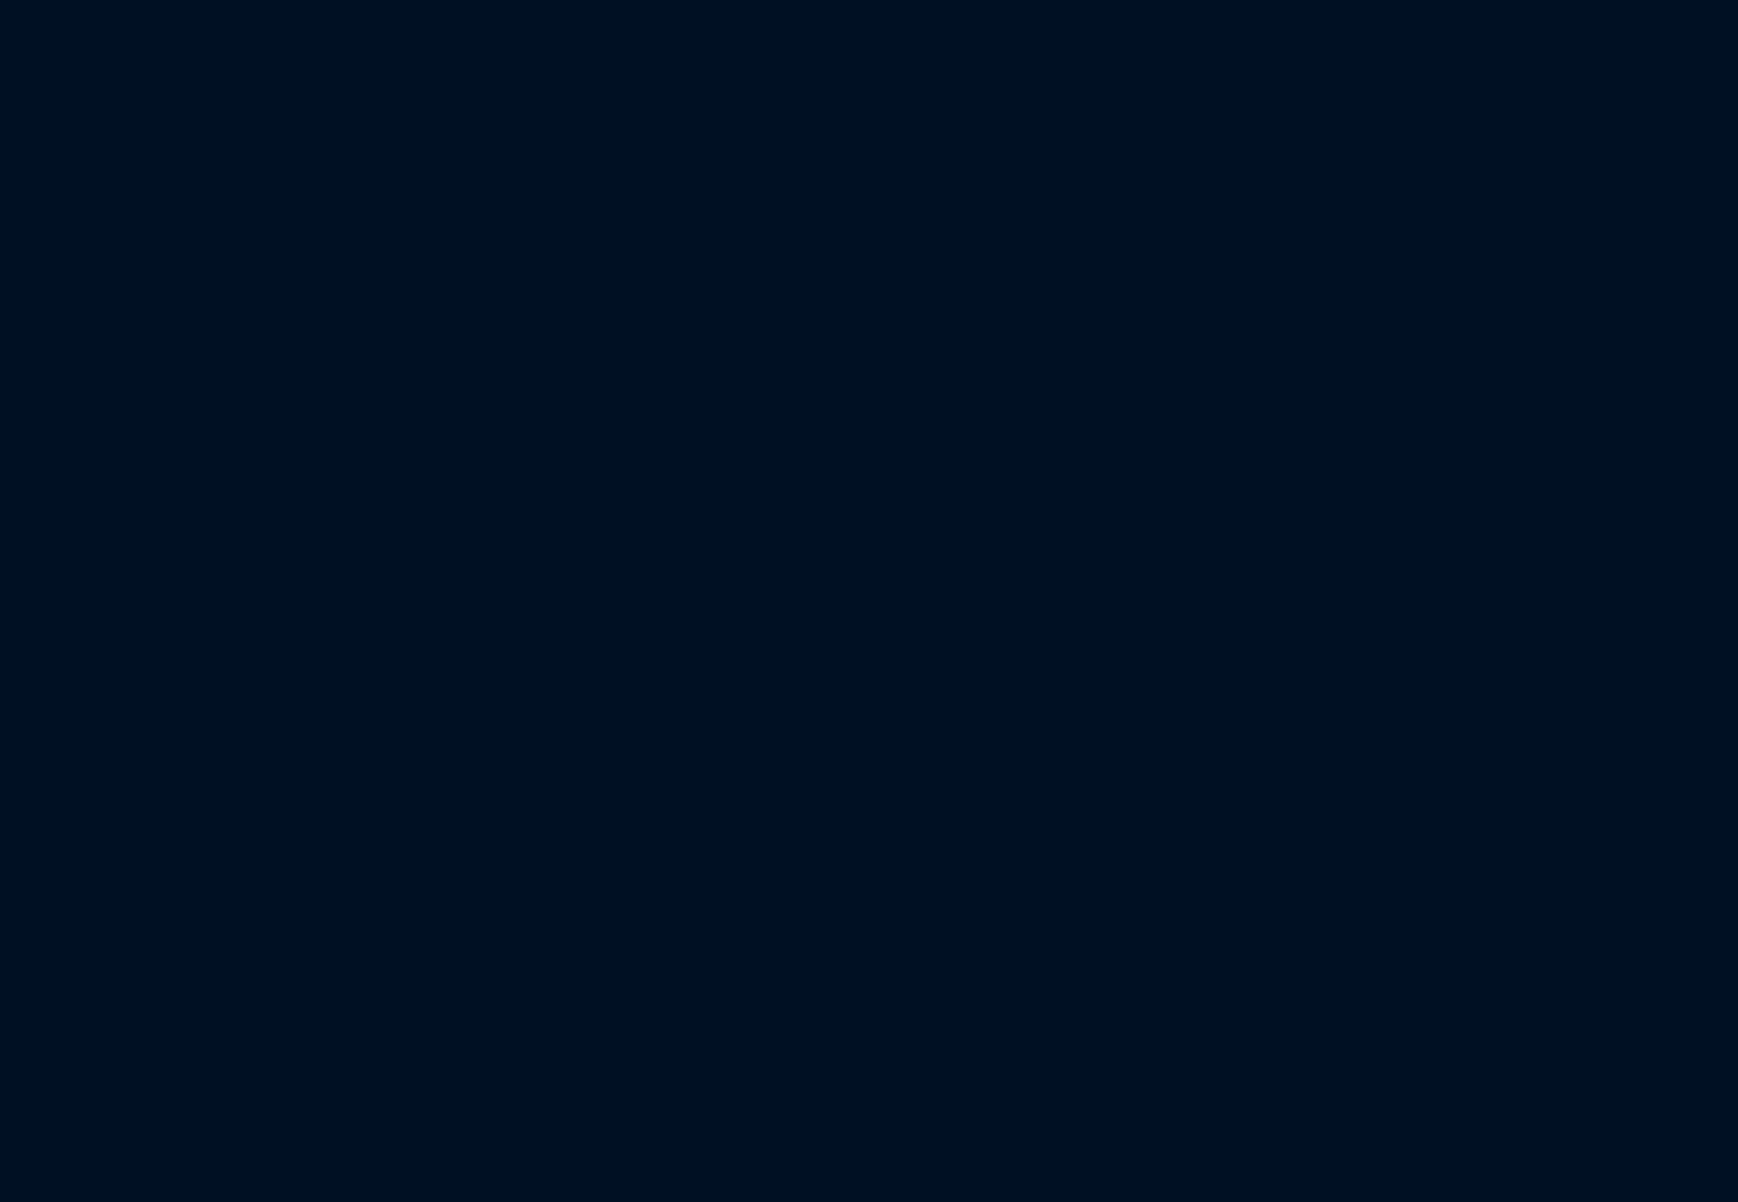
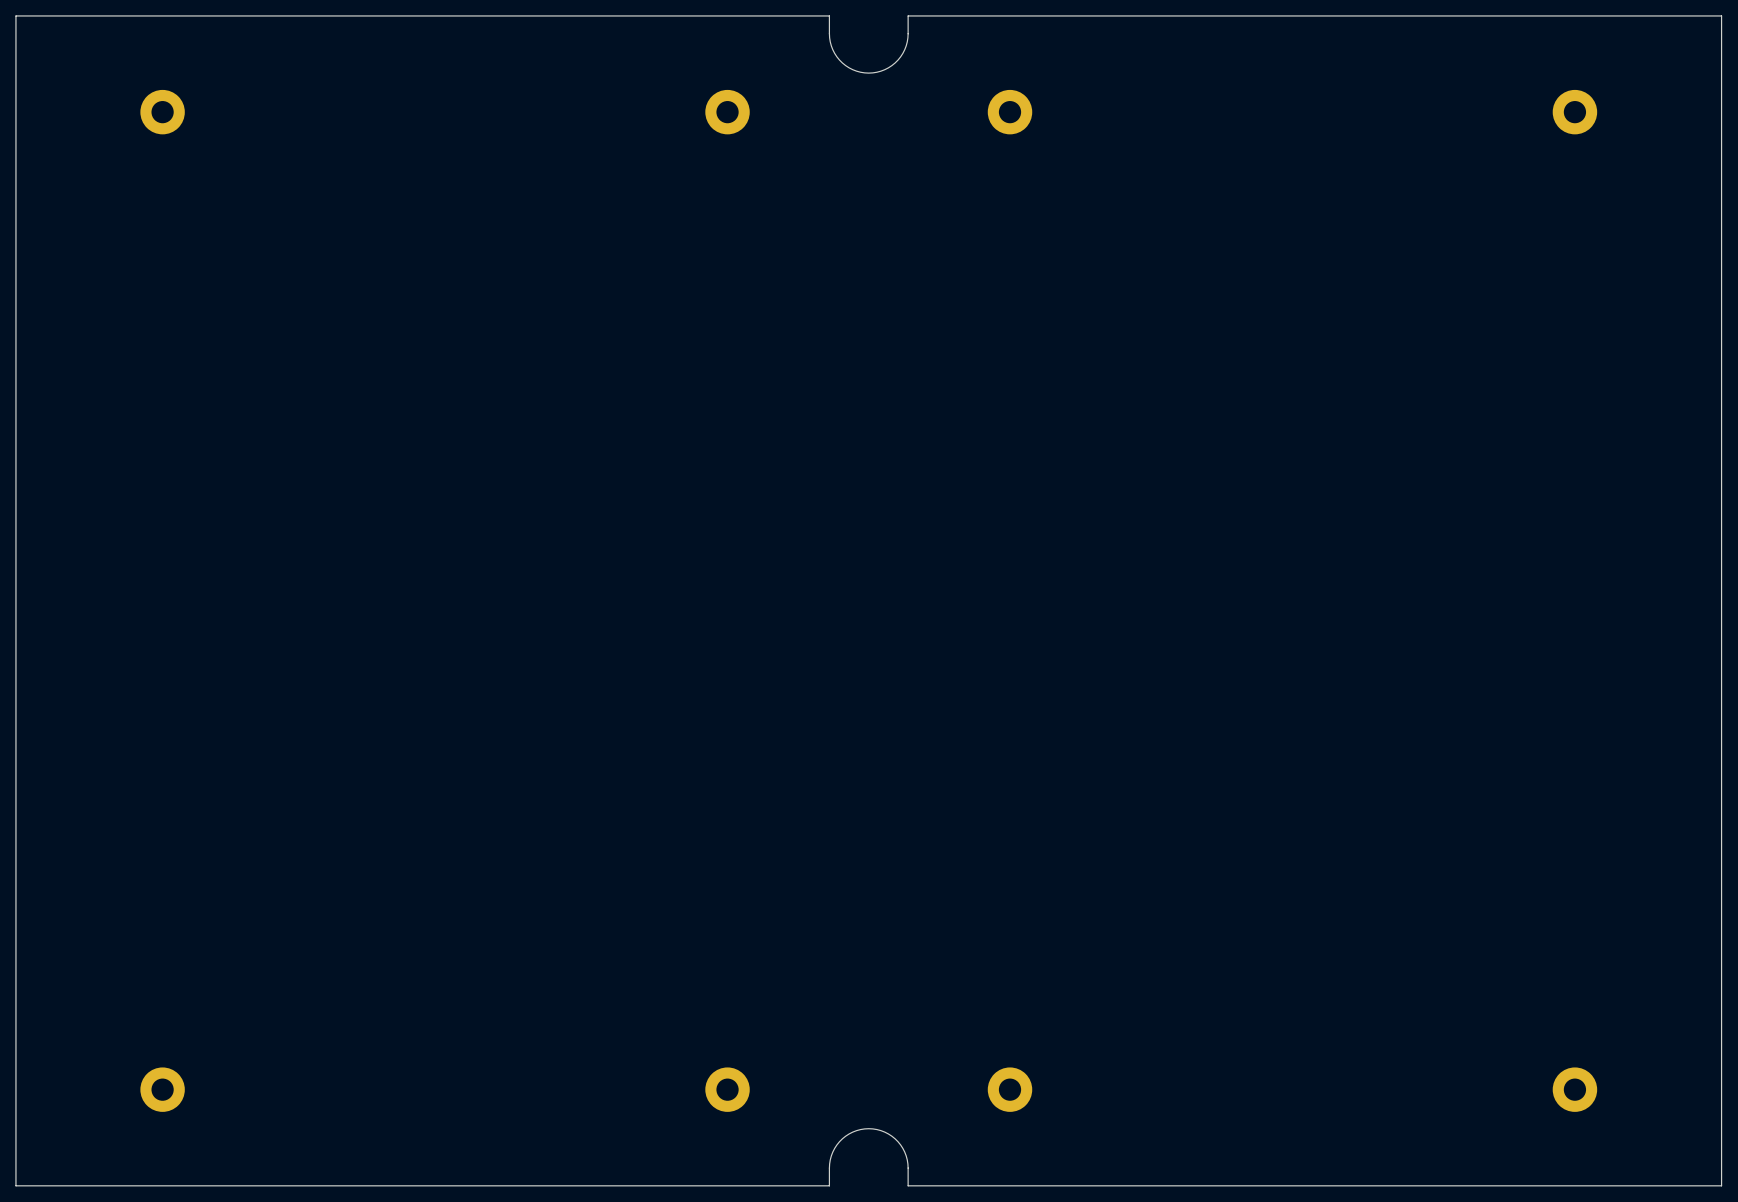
board edge: none -> (15, 15) (829, 15) (830, 41) (836, 56) (852, 69) (868, 73) (884, 69) (900, 56) (907, 41) (908, 15) (1721, 15) (1721, 1185) (908, 1185) (907, 1159) (900, 1144) (888, 1133) (868, 1128) (852, 1132) (836, 1144) (830, 1159) (829, 1185) (15, 1185) (15, 15)
part: none -> (162, 112)
part: none -> (727, 112)
part: none -> (1010, 112)
part: none -> (1574, 112)
part: none -> (162, 1089)
part: none -> (727, 1089)
part: none -> (1010, 1089)
part: none -> (1574, 1089)

